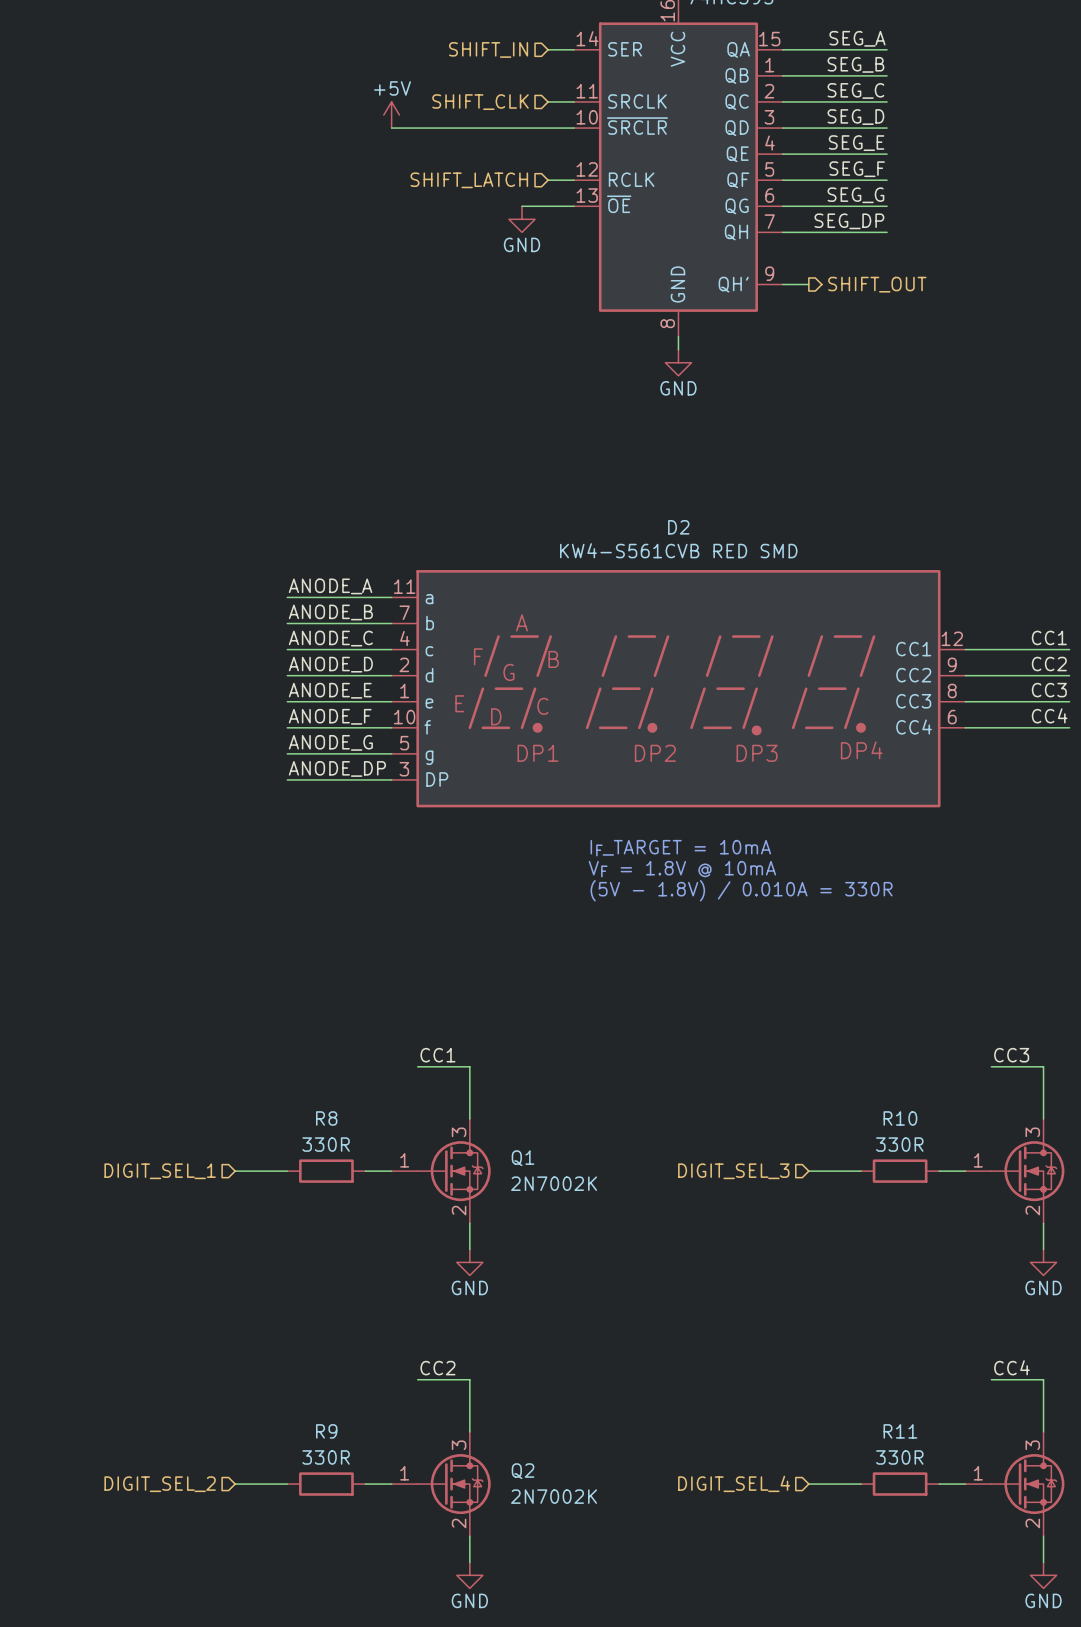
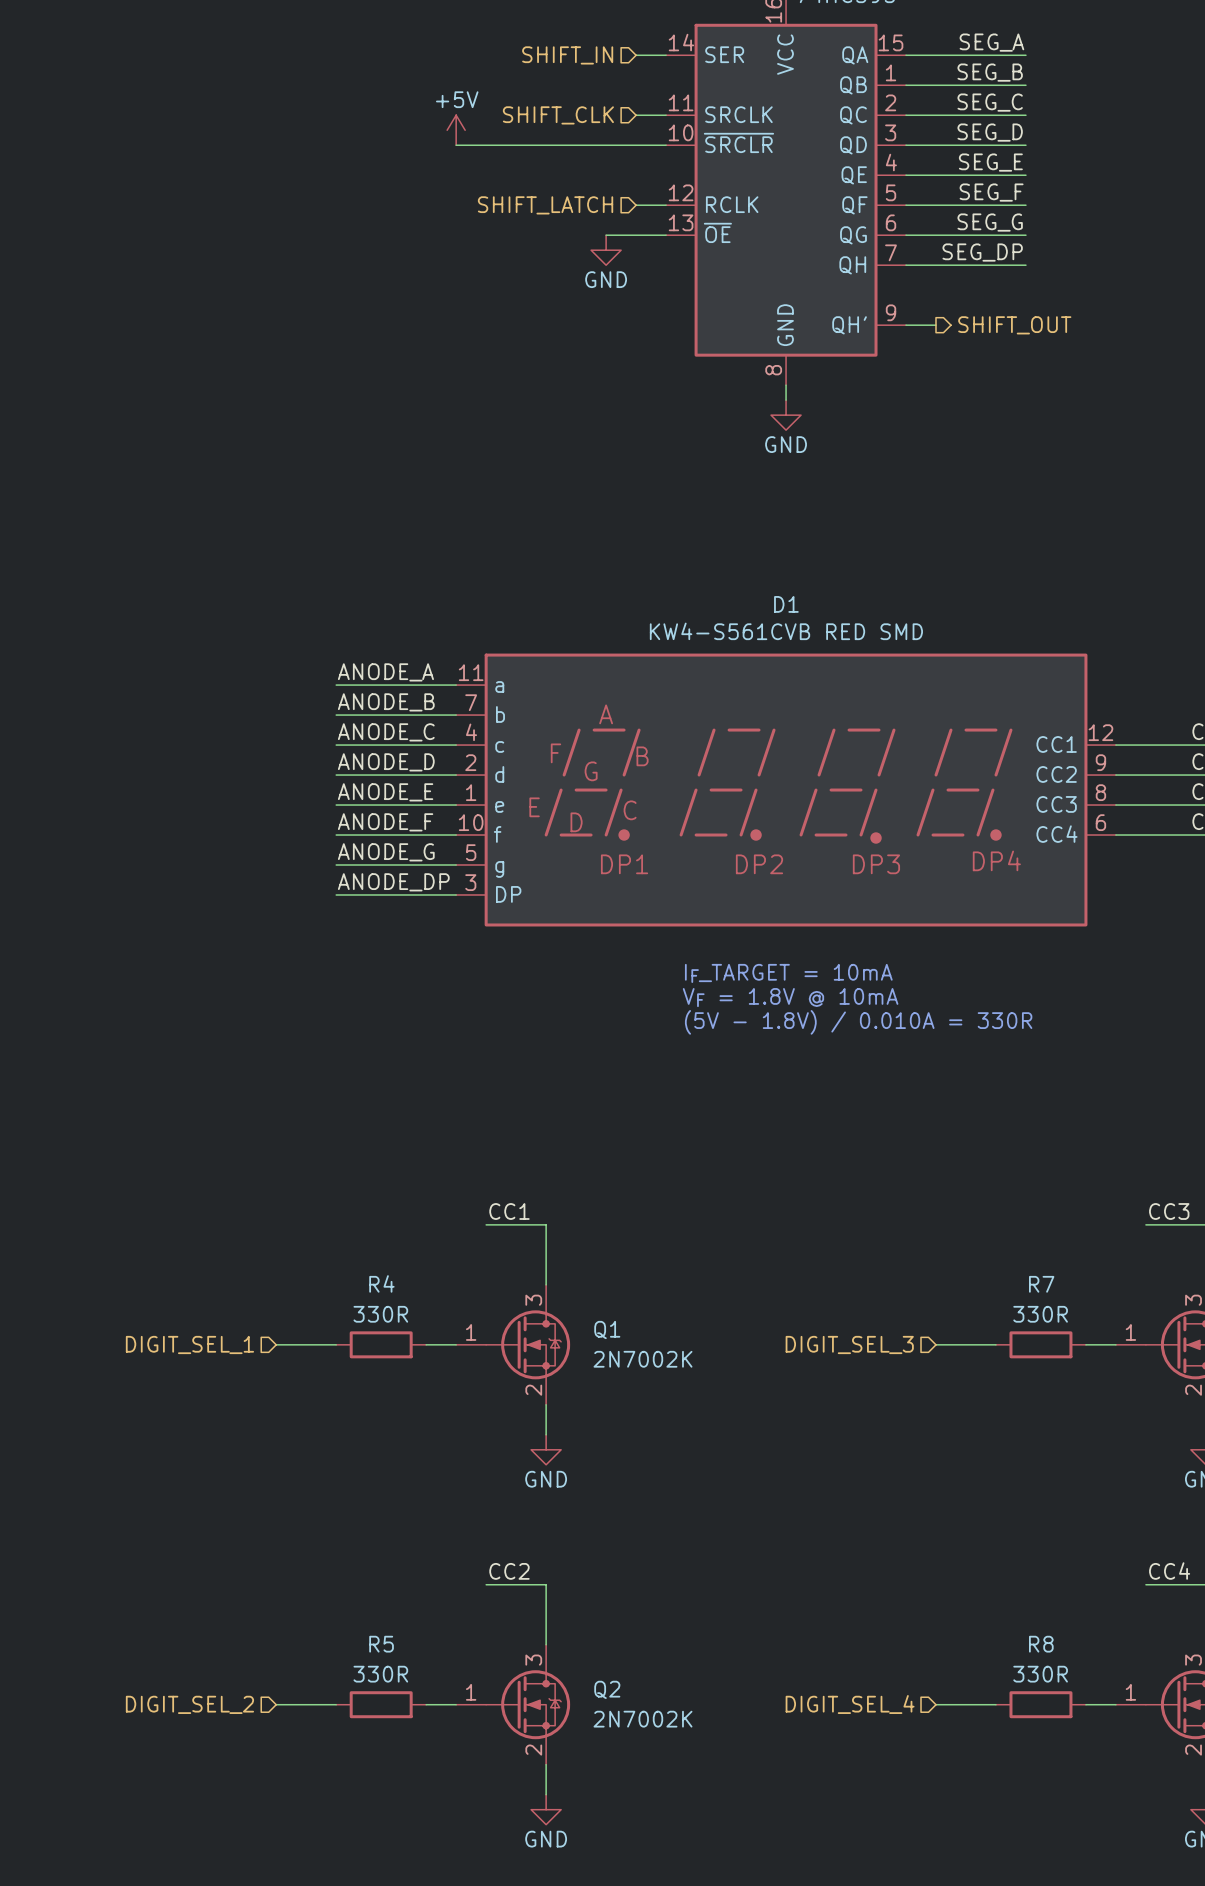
D2 name: D2 (678, 527) -> D1 (786, 604)
R8 name: R8 (326, 1118) -> R4 (381, 1283)
R10 name: R10 (900, 1118) -> R7 (1041, 1284)
R9 name: R9 (326, 1431) -> R5 (381, 1644)
R11 name: R11 (900, 1431) -> R8 (1041, 1644)

